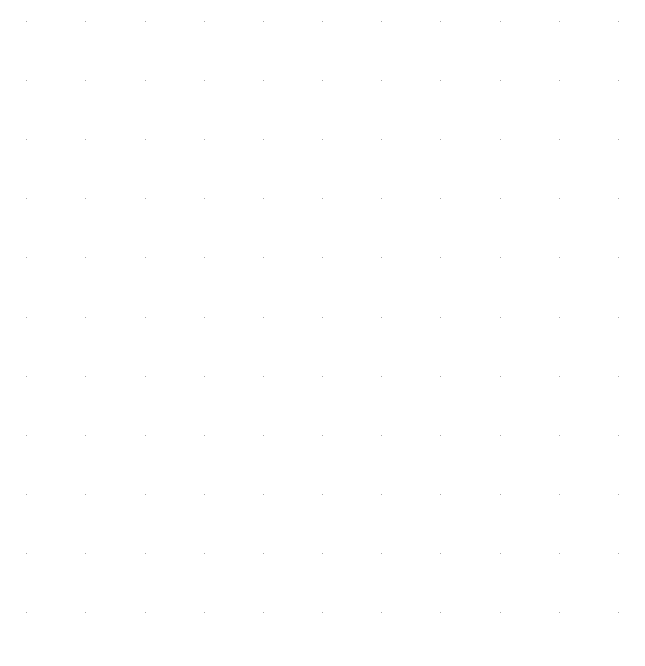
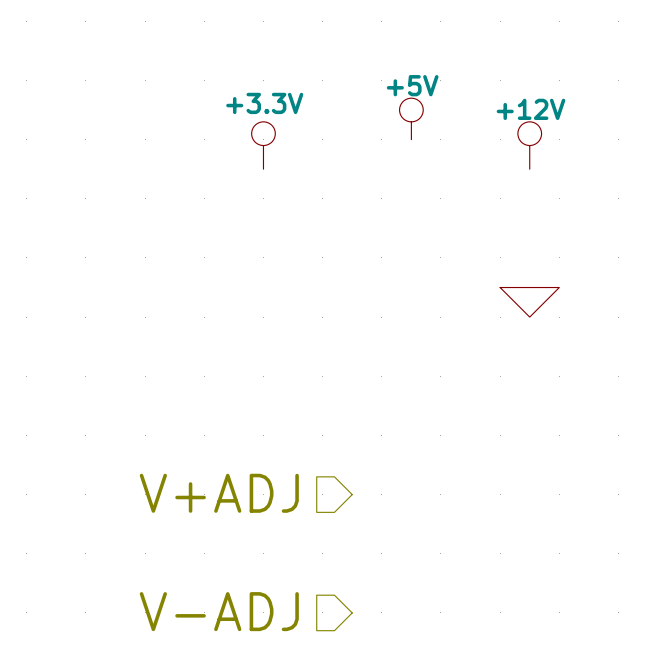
power symbol: none -> +5V (411, 118)
power symbol: none -> +3.3V (263, 145)
power symbol: none -> +12V (529, 145)
power symbol: none -> (529, 302)
hierarchical label: none -> V+ADJ (219, 493)
hierarchical label: none -> V-ADJ (219, 611)

